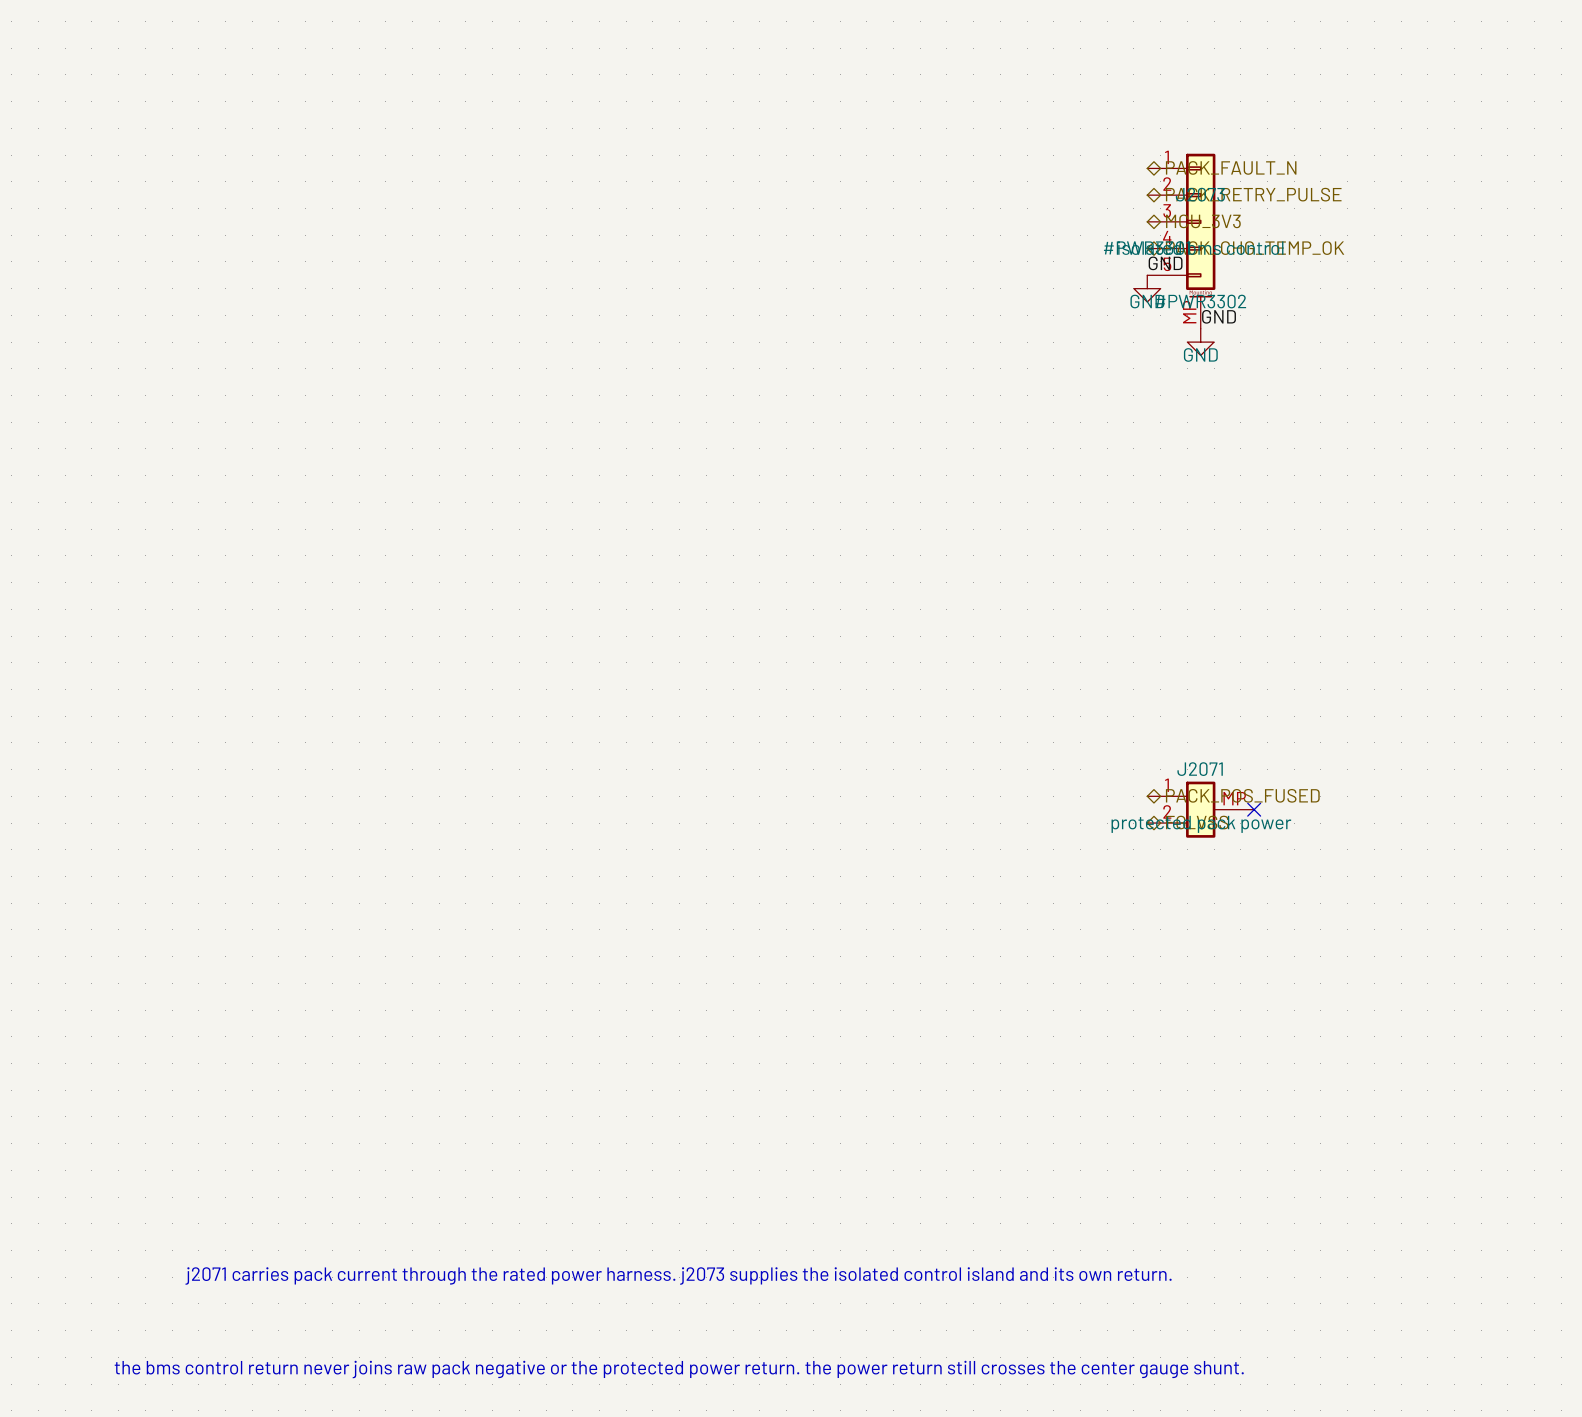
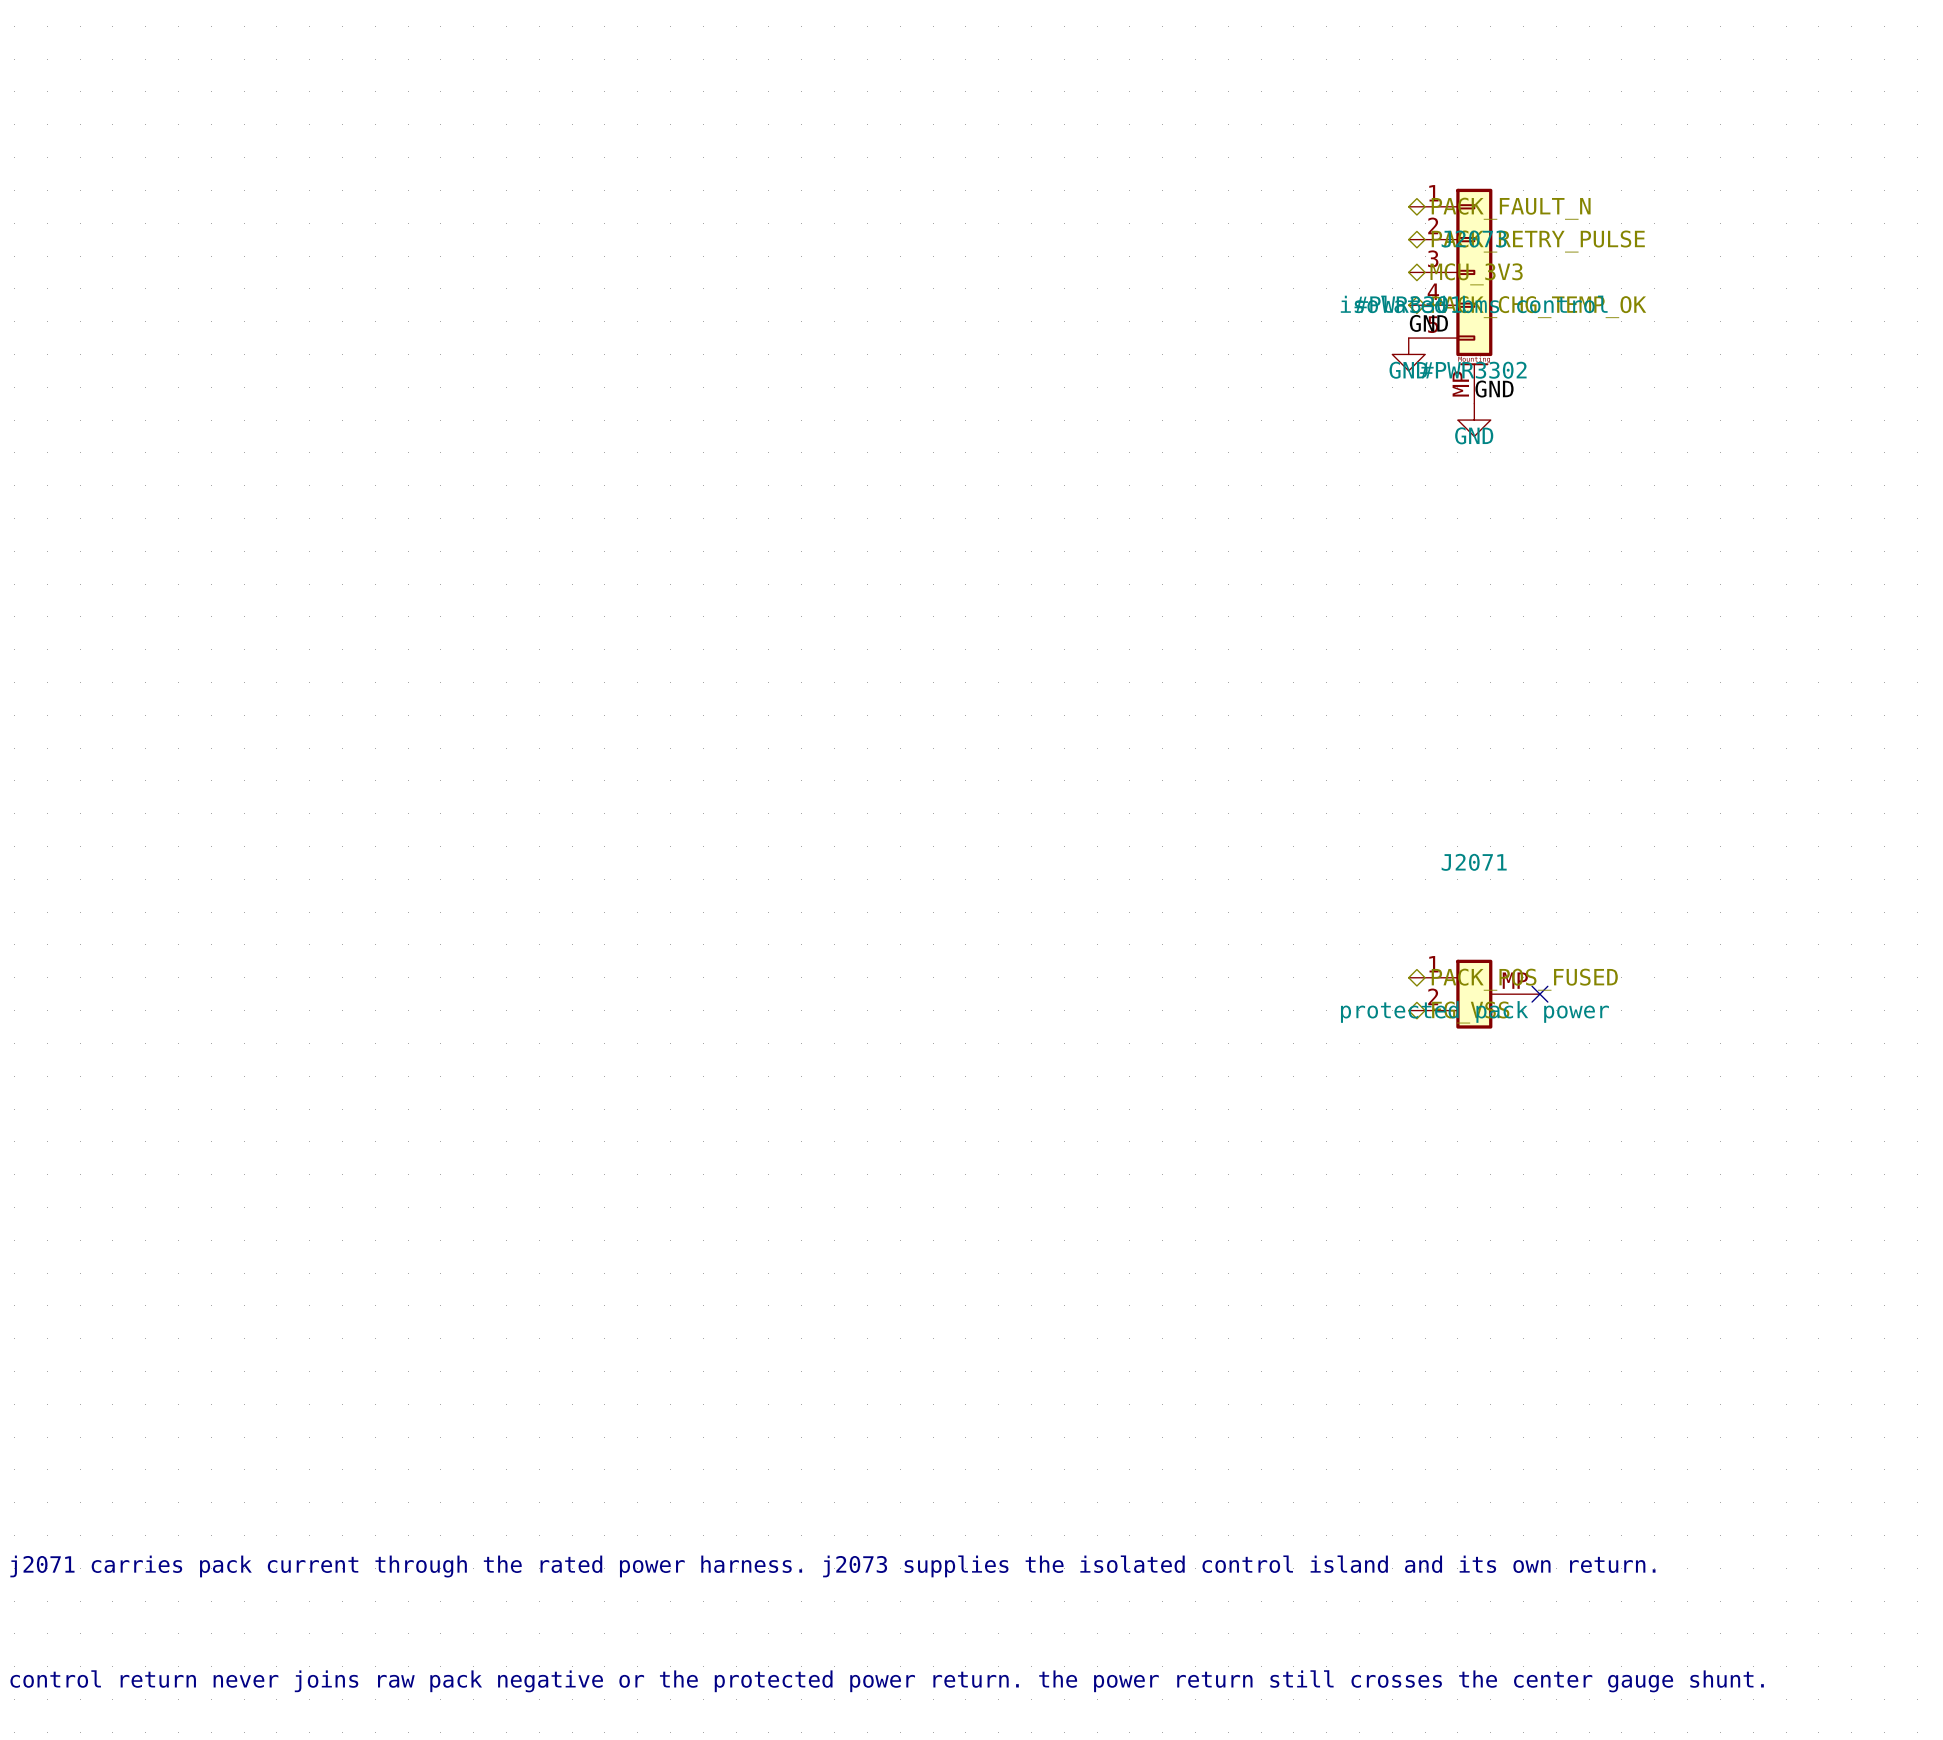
J2071 name position: J2071 (1200, 769) -> J2071 (1474, 862)

